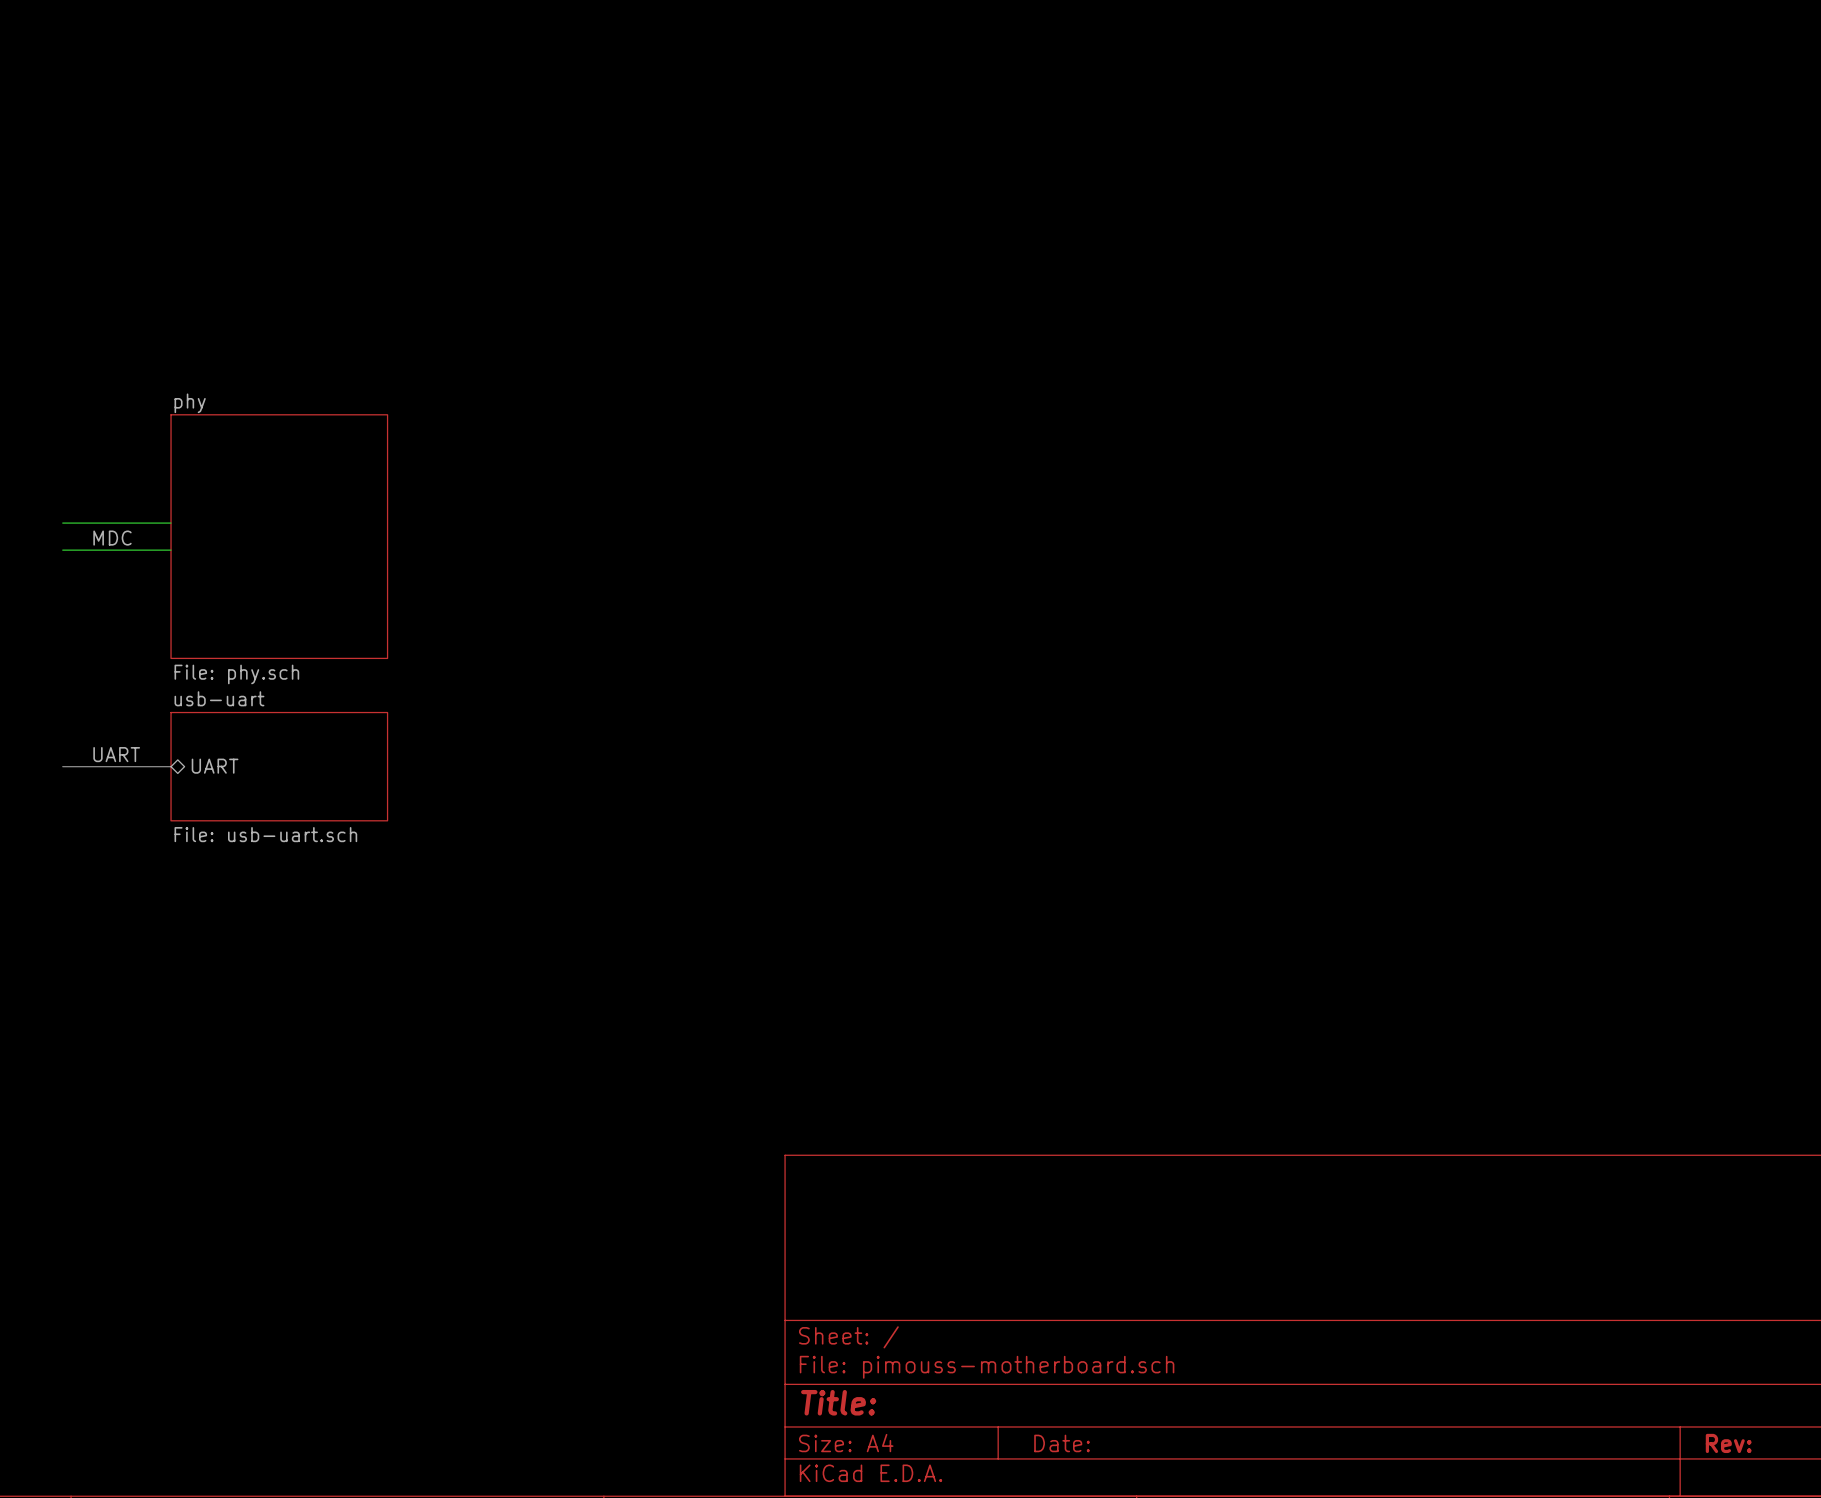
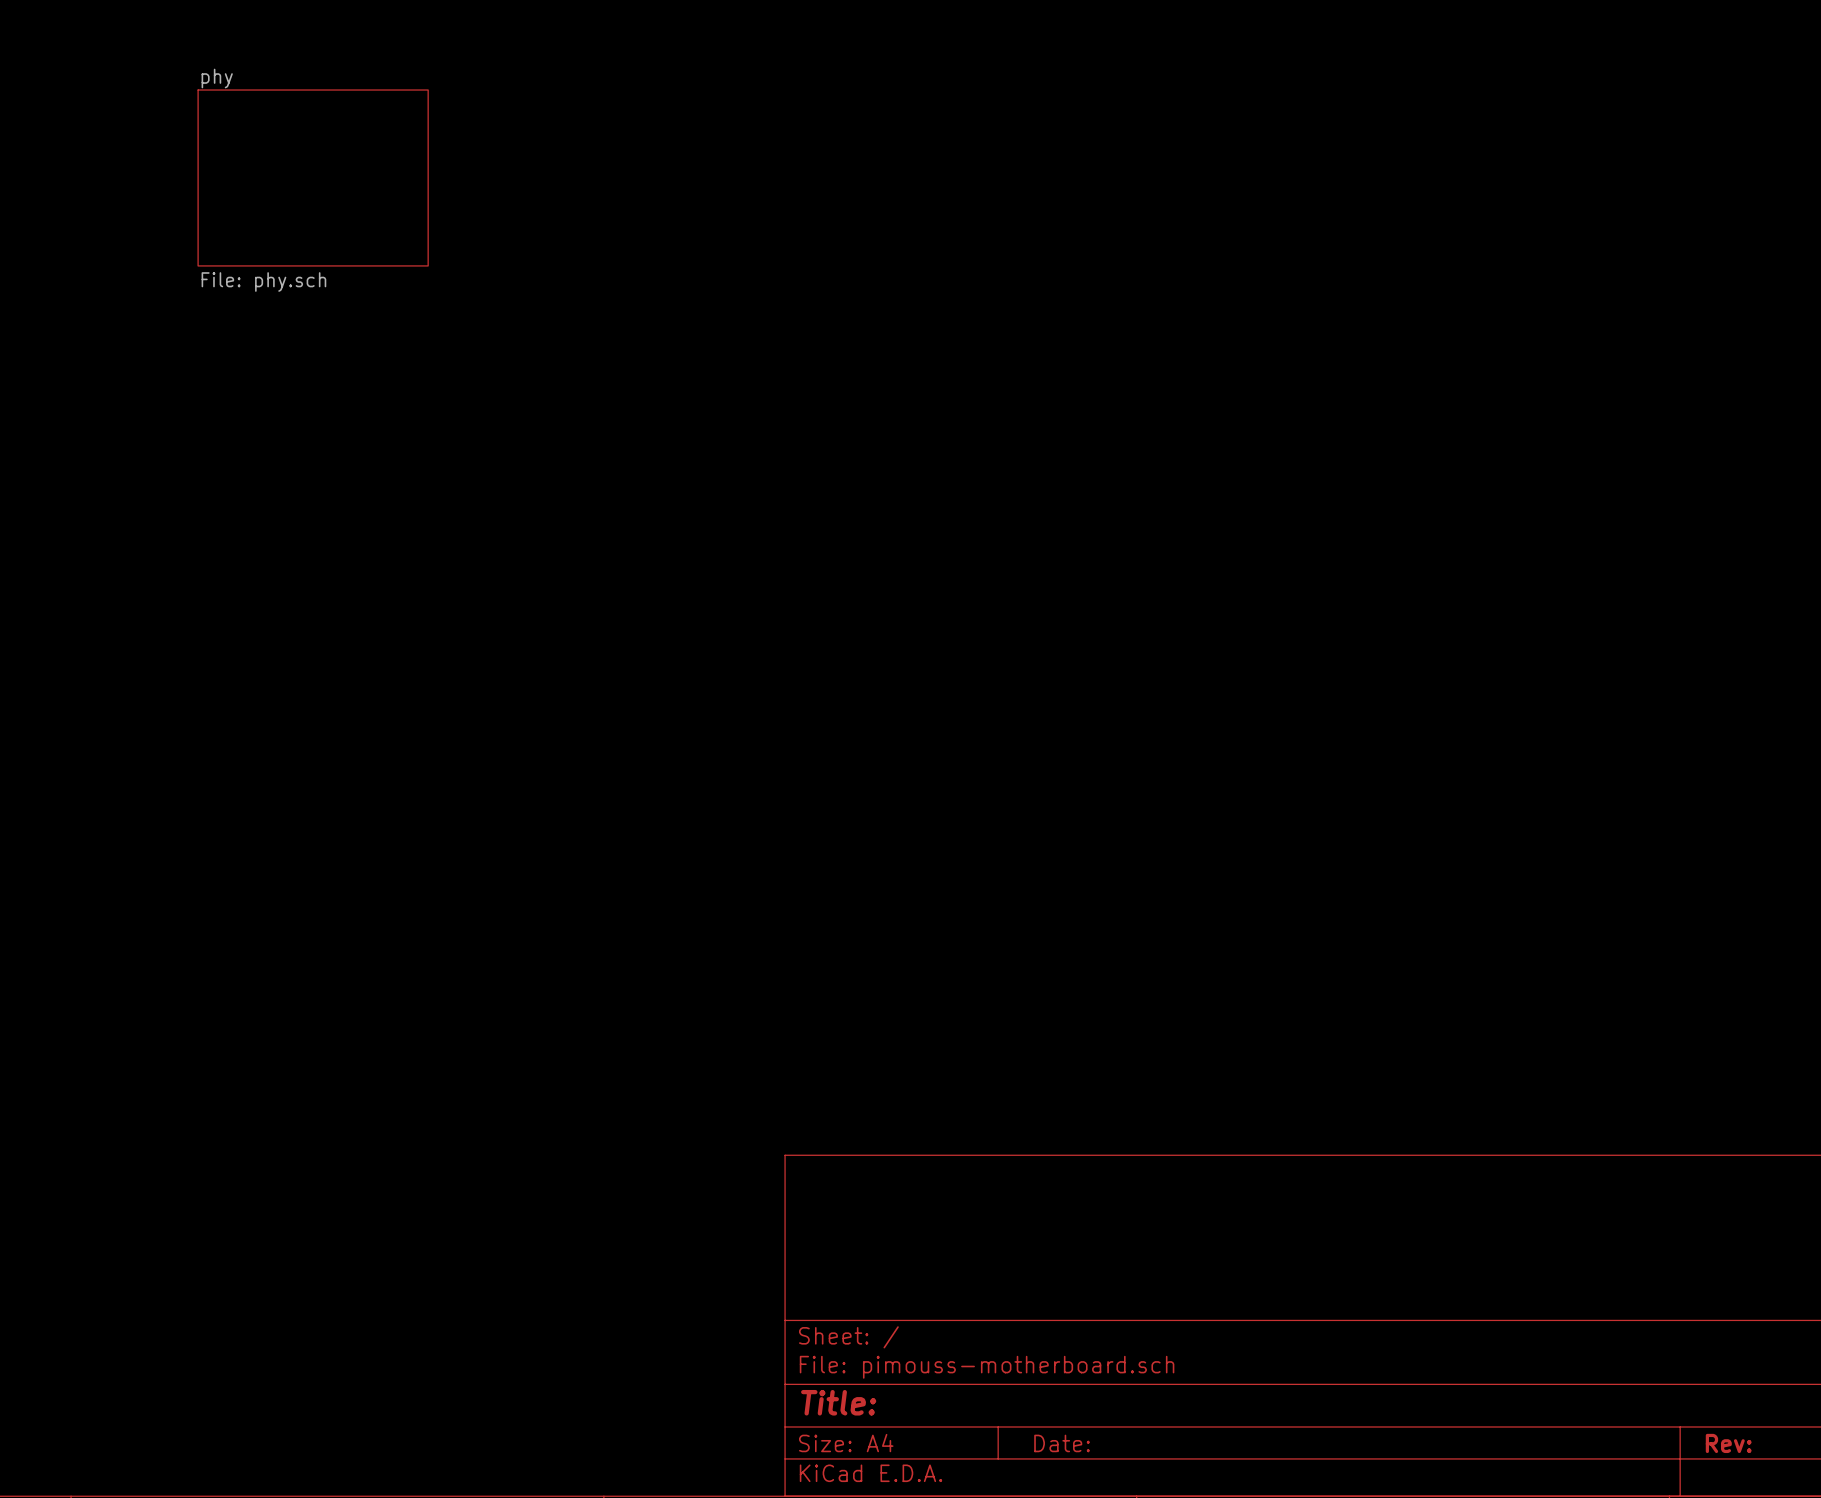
sheet phy: none -> File: phy.sch (313, 177)
wire: (62, 523) (171, 523) -> none
sheet phy: File: phy.sch (279, 536) -> none
label: MDC (112, 538) -> none
wire: (62, 550) (171, 550) -> none
label: UART (116, 754) -> none
bus: (62, 766) (171, 766) -> none
sheet pin: UART (215, 766) -> none
sheet usb-uart: File: usb-uart.sch (279, 766) -> none

